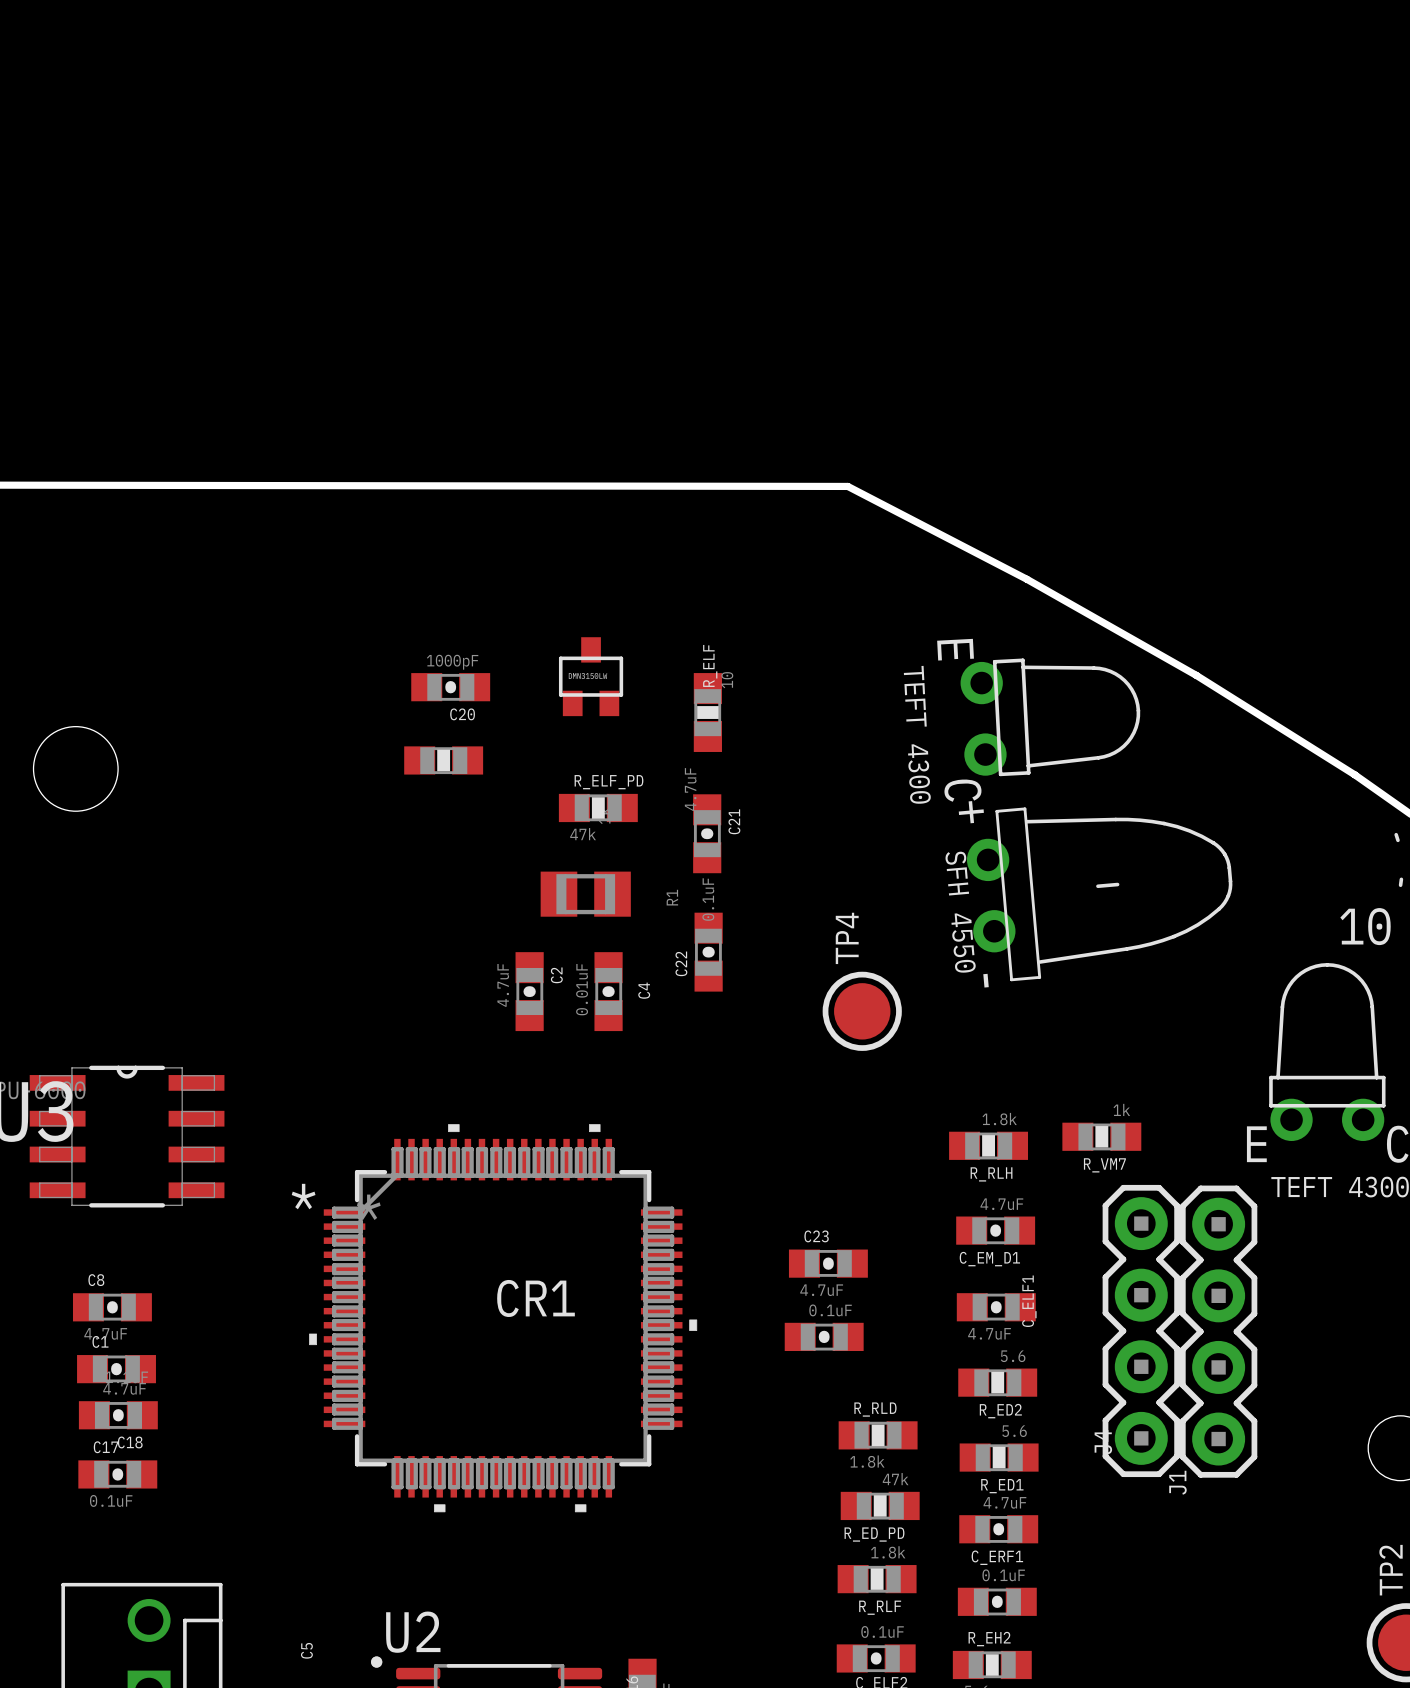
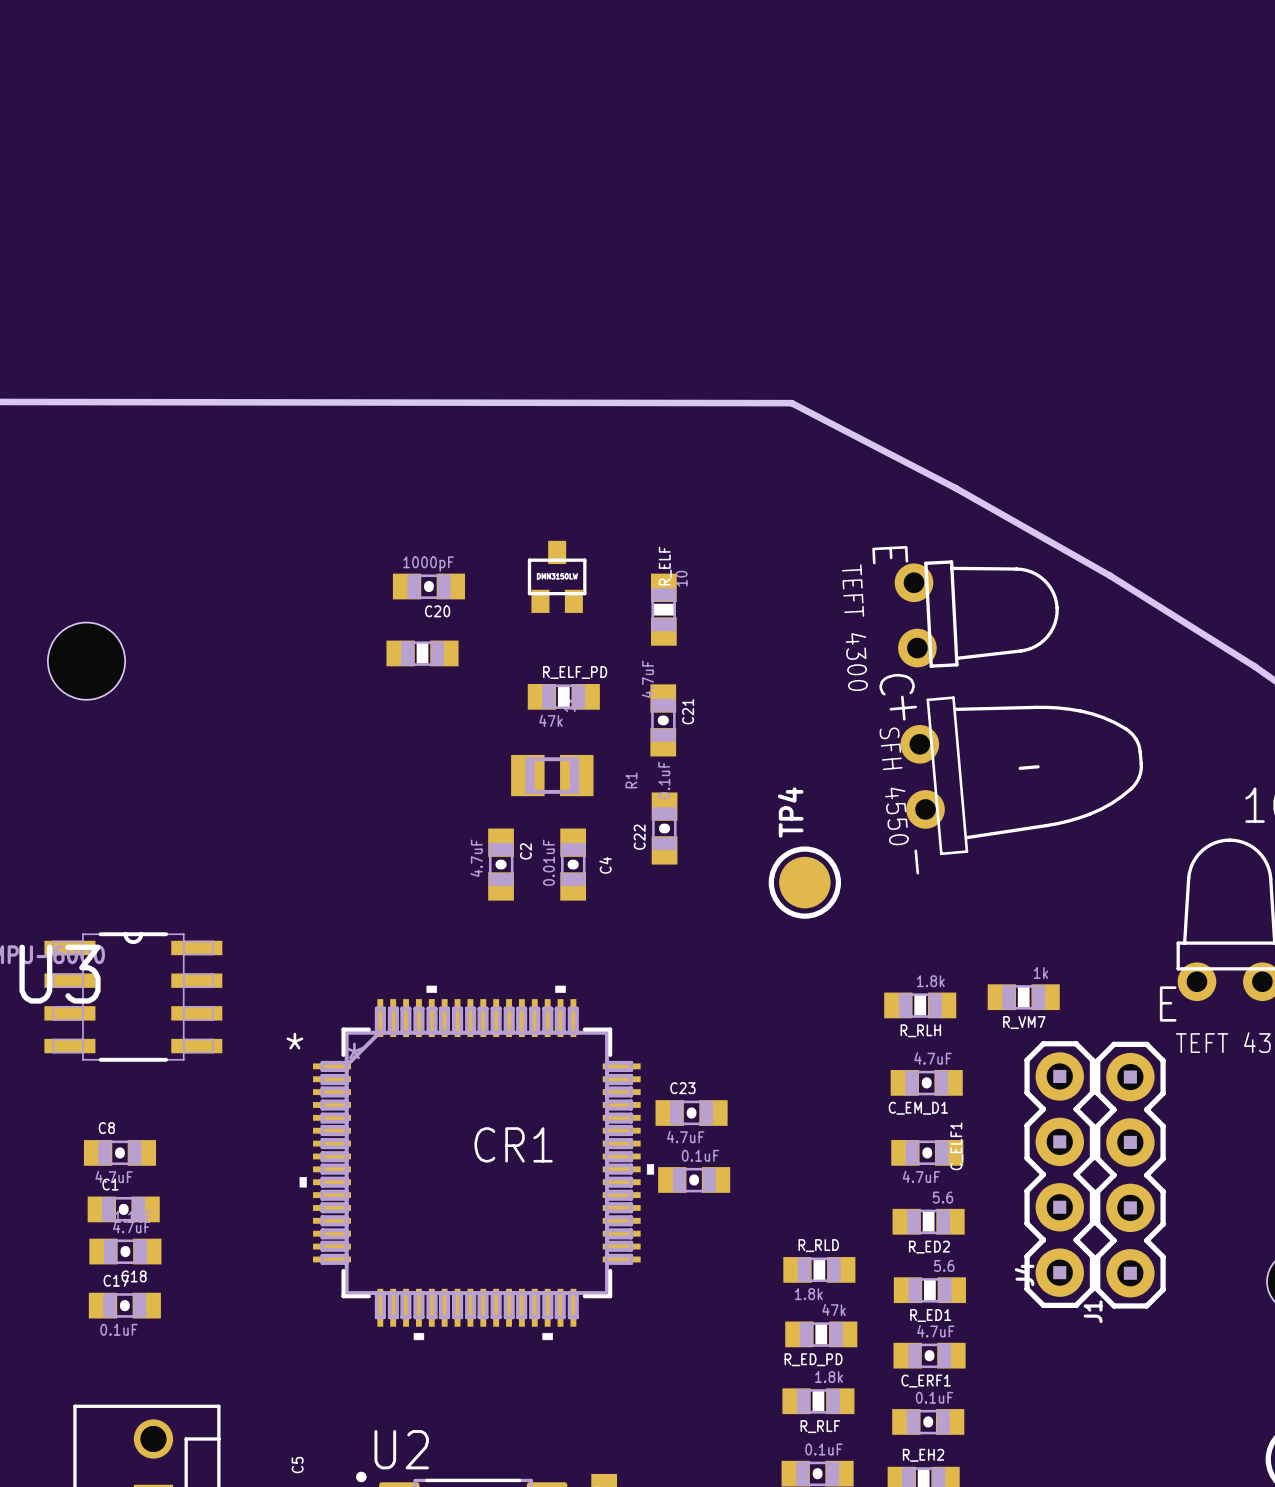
C23 position: (828, 1263) -> (691, 1113)
part position: (824, 1336) -> (694, 1179)

